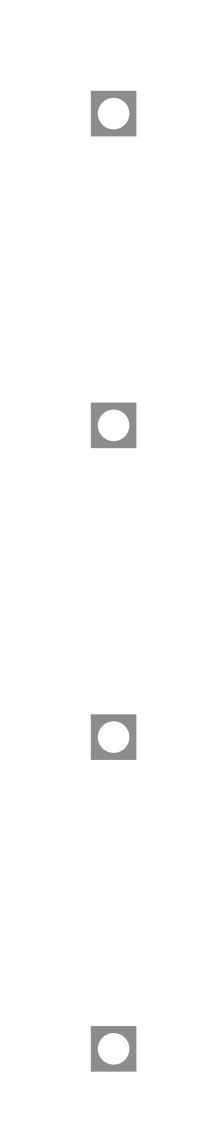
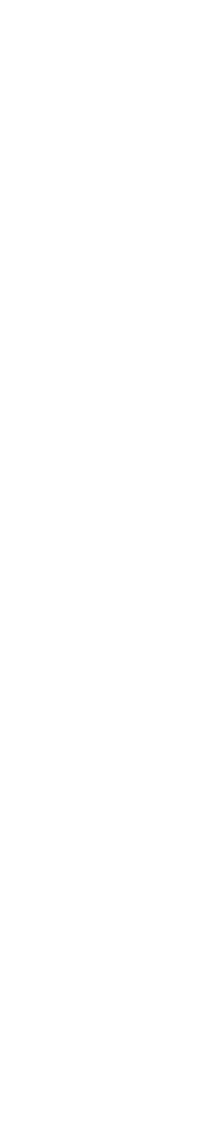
part: (113, 113) -> none
part: (113, 425) -> none
part: (113, 737) -> none
part: (113, 1048) -> none

